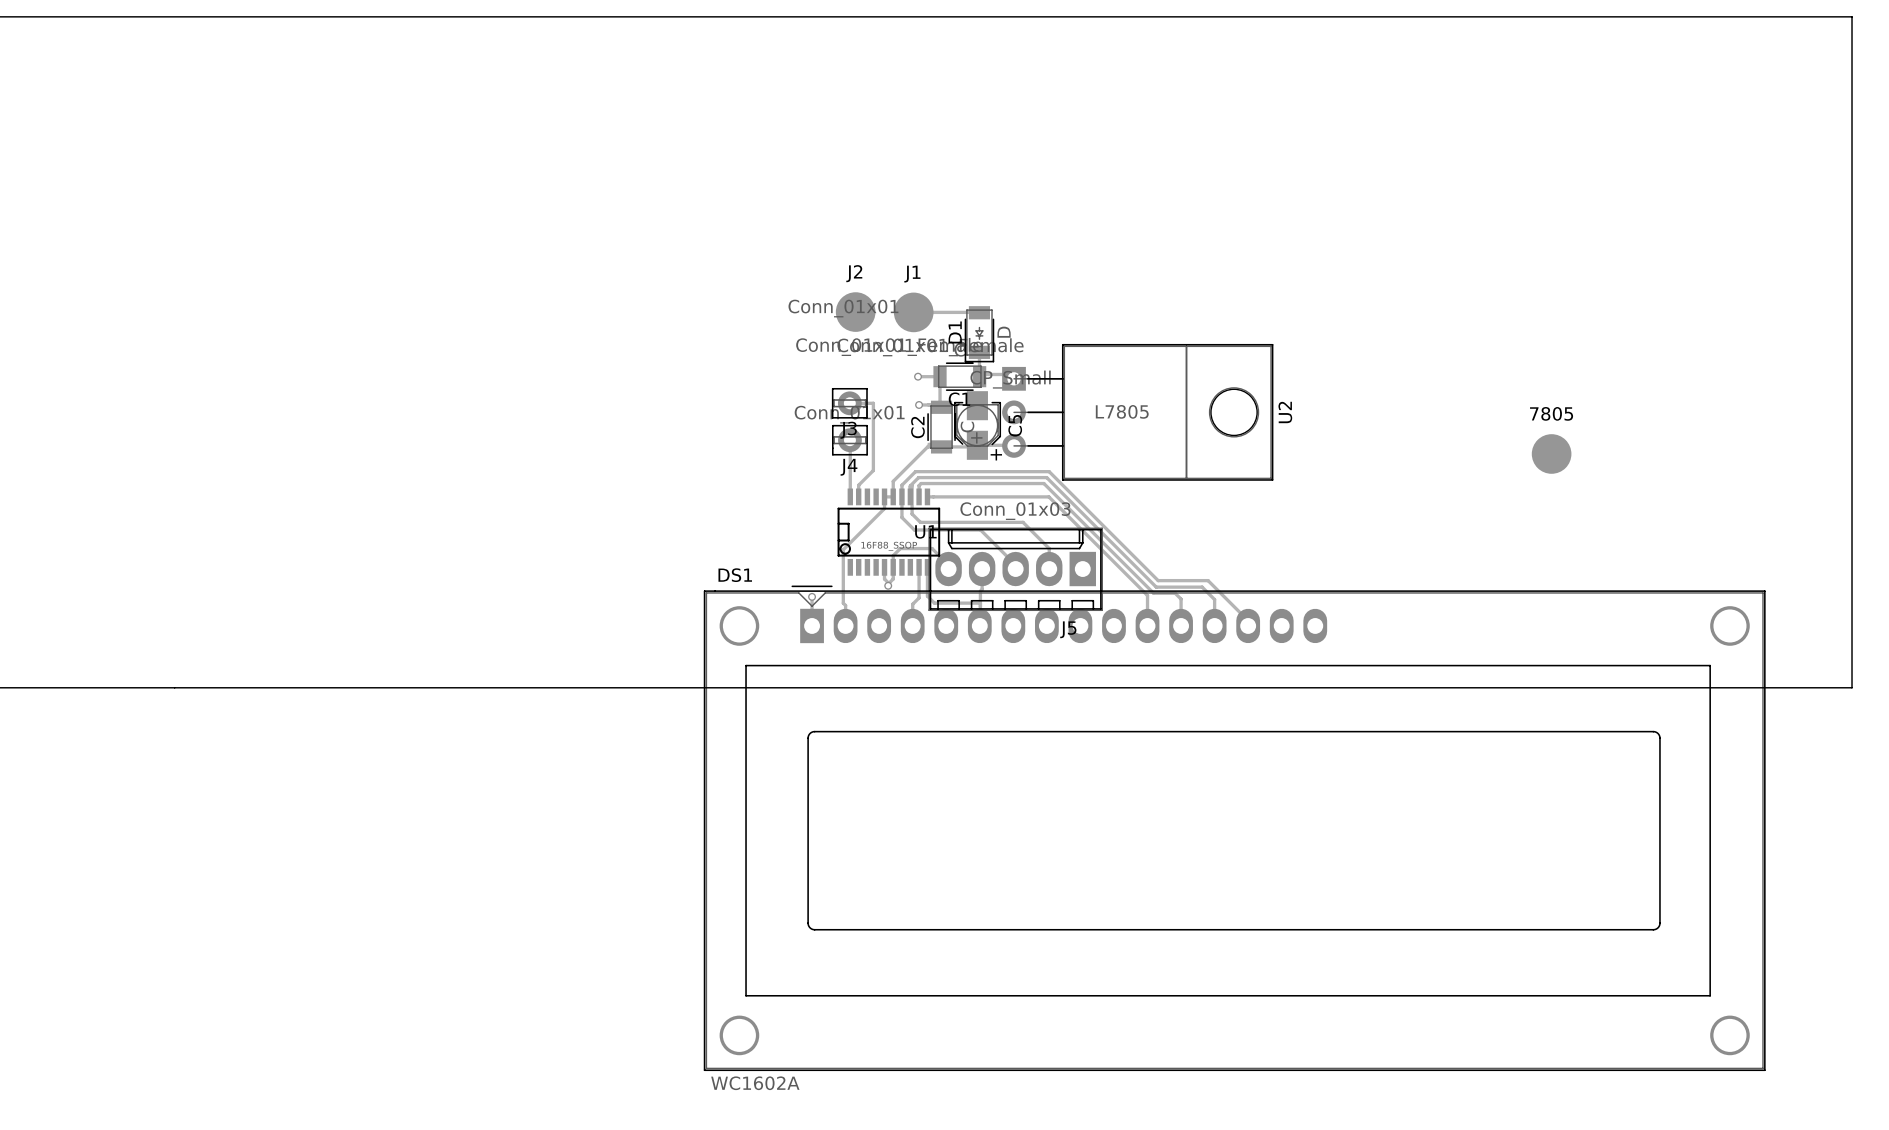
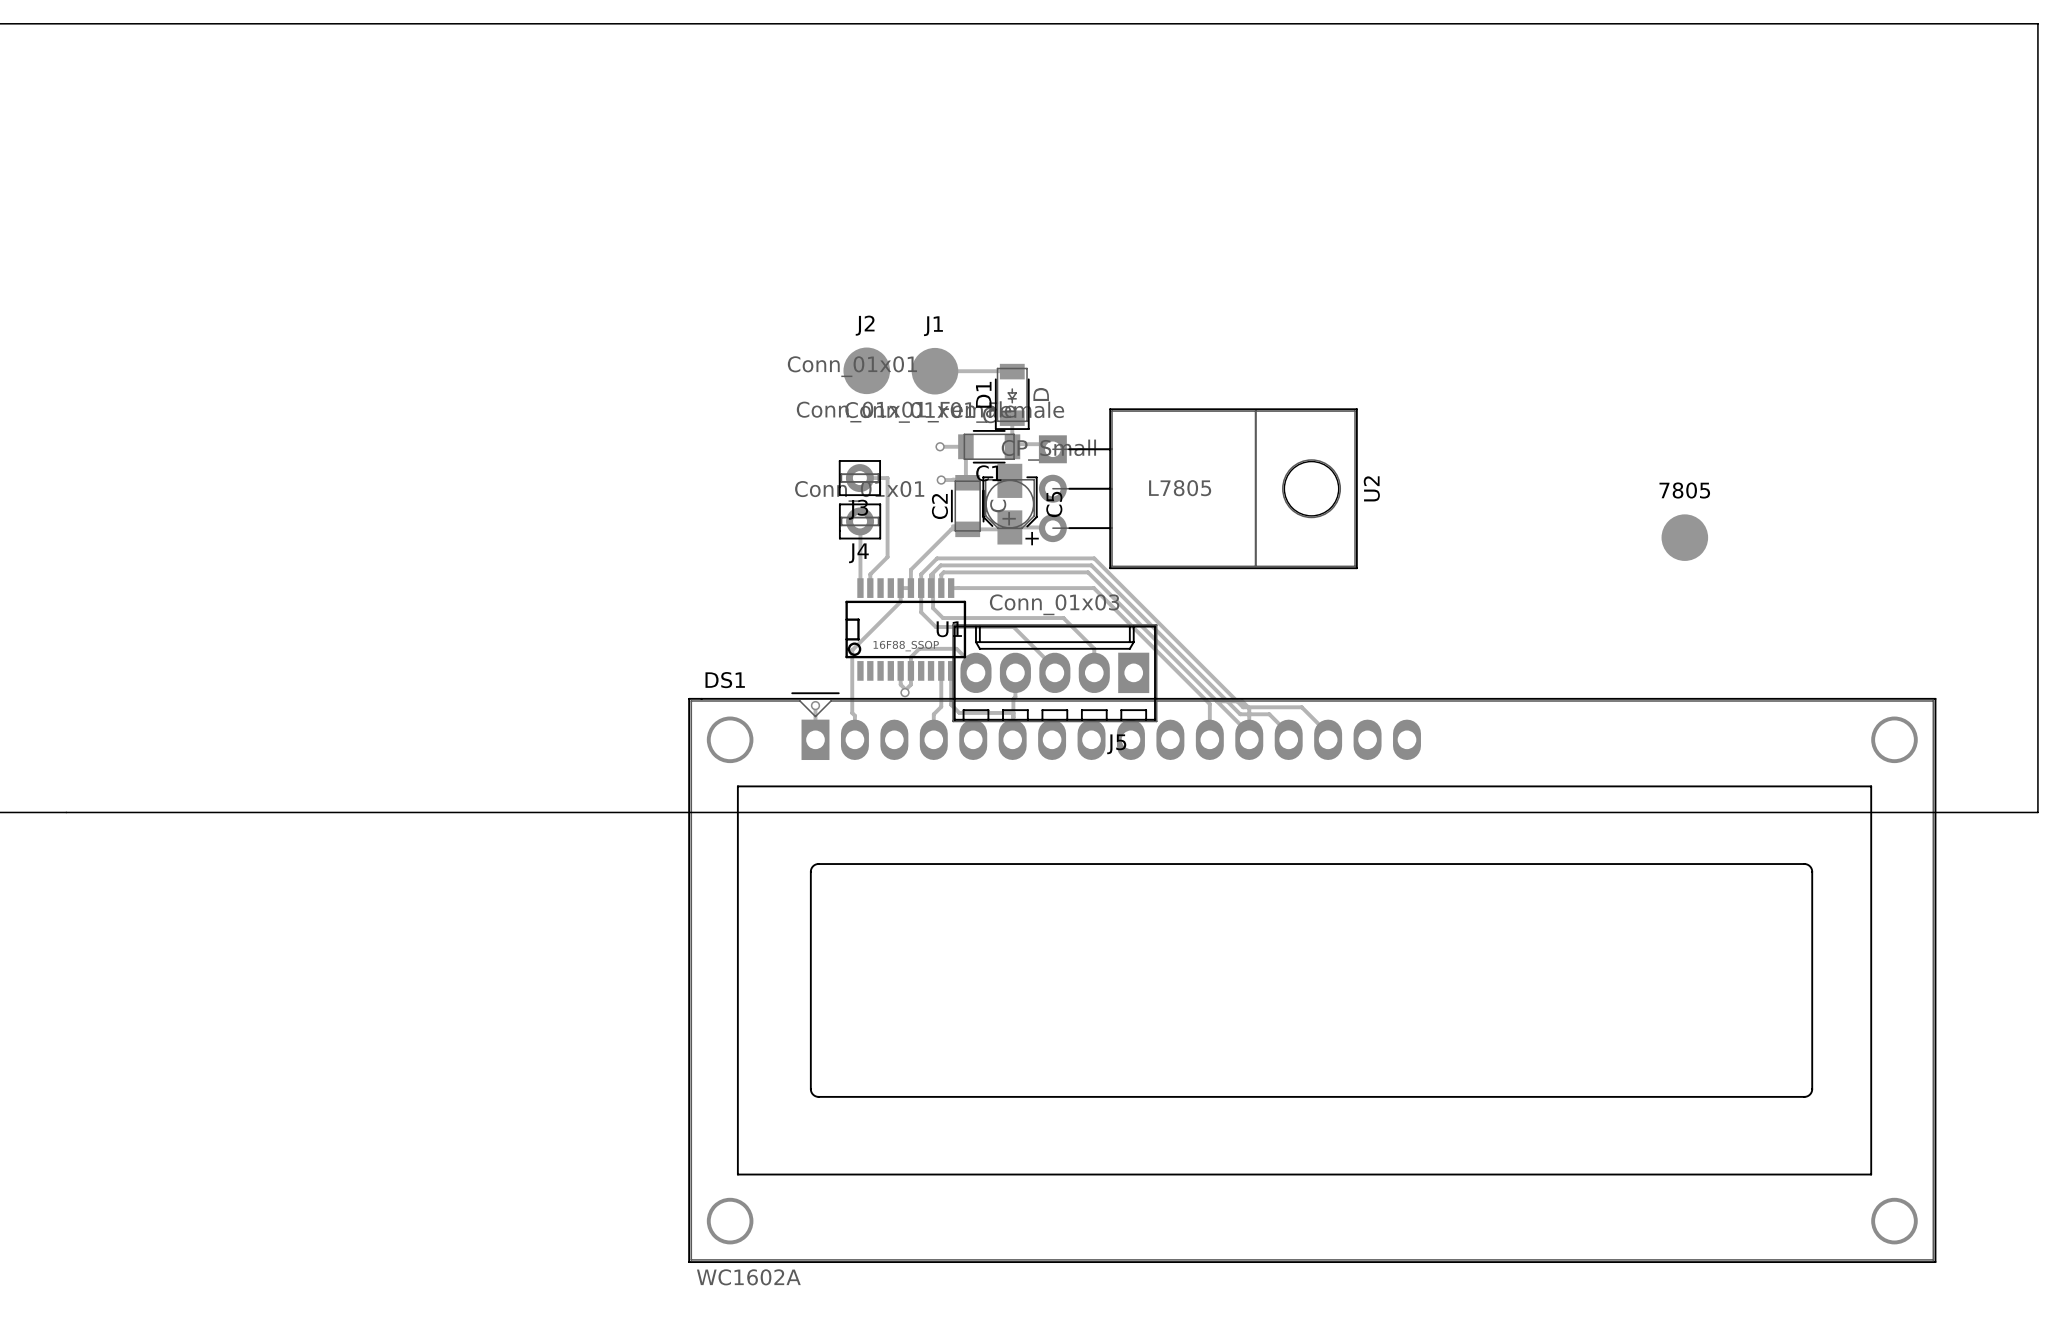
track: (1043, 483) (1153, 593) -> (1088, 572) (1249, 733)
track: (1158, 580) (1208, 580) (1225, 598) -> (1222, 686) (1243, 707) (1301, 707)
track: (1156, 587) (1202, 587) (1214, 599) (1214, 620) -> (1220, 694) (1240, 714) (1269, 714) (1288, 733)

